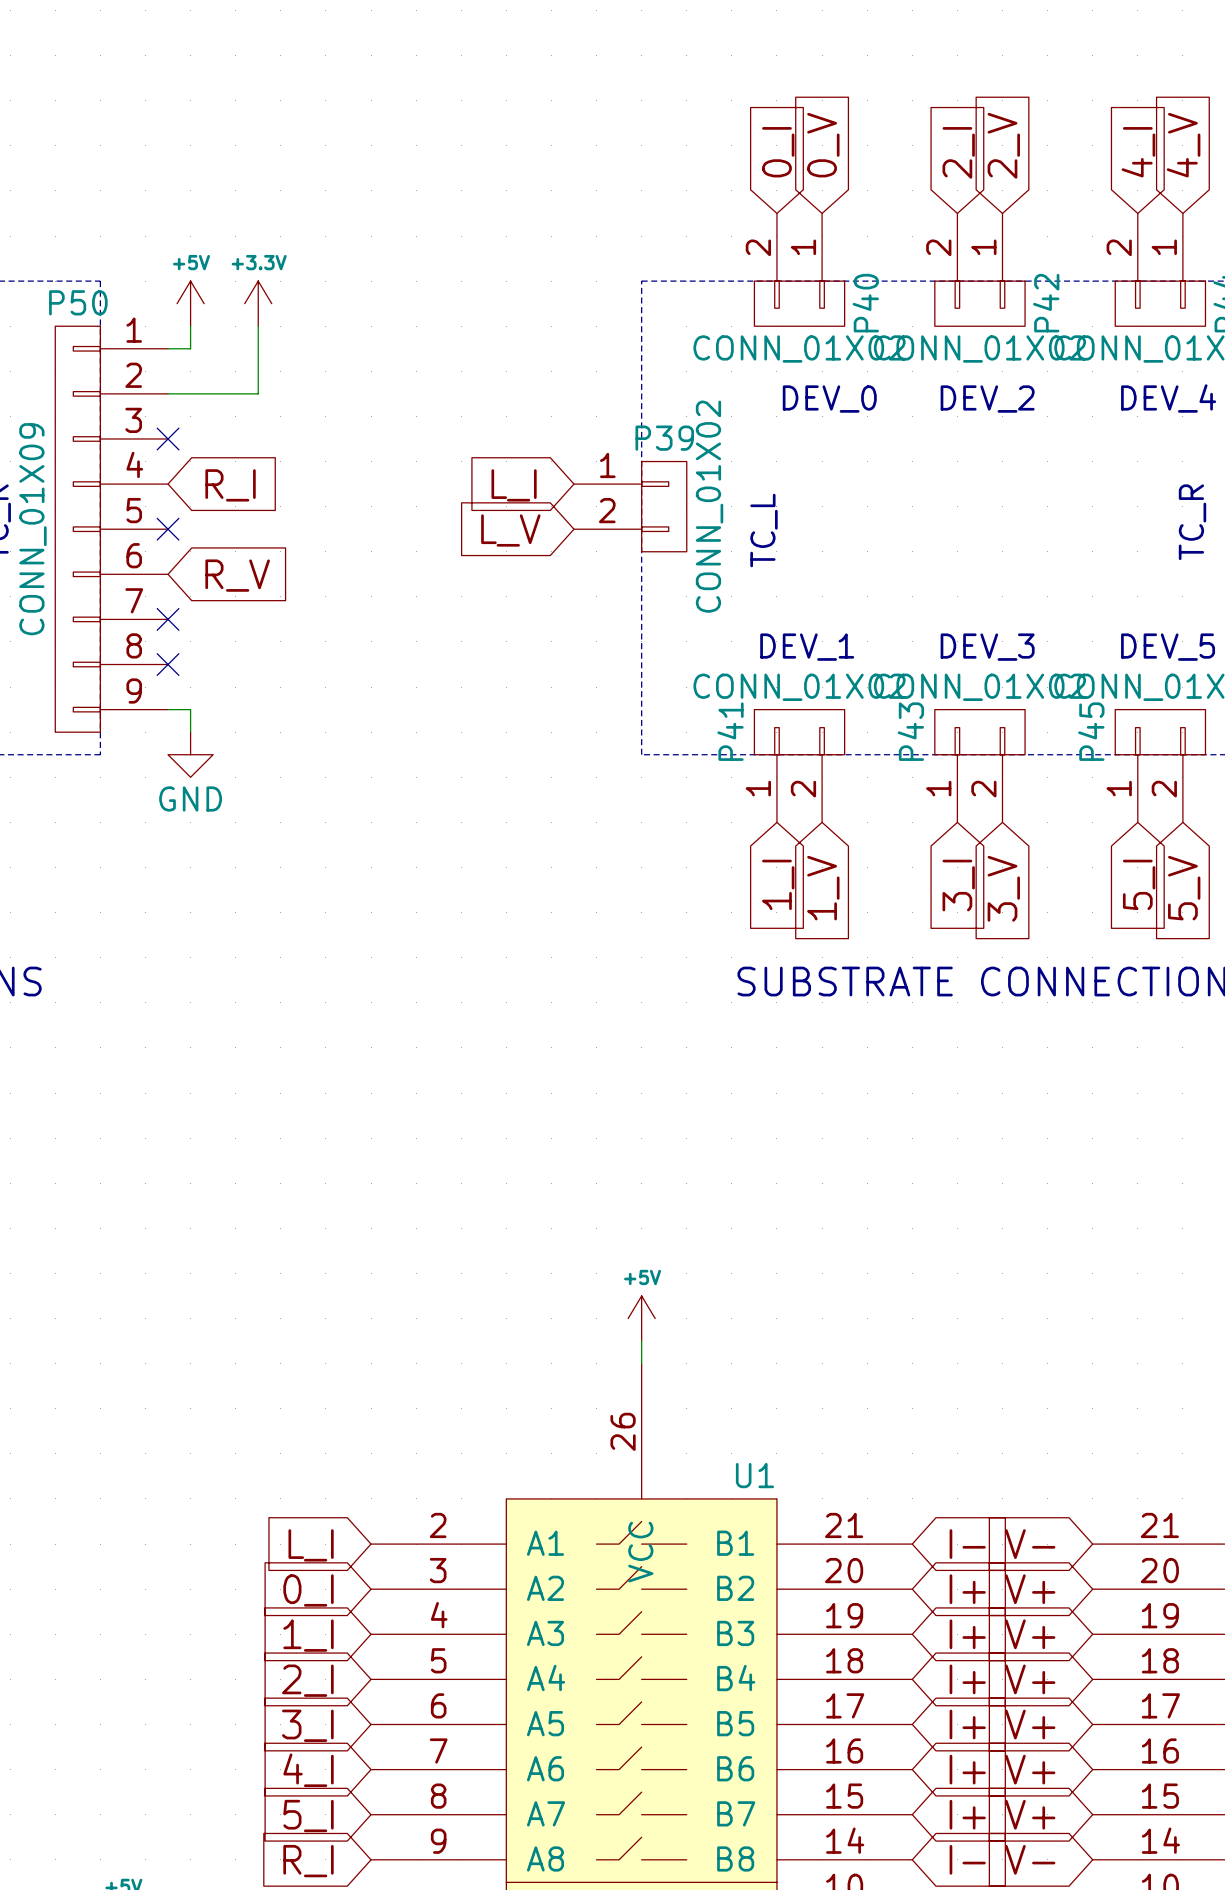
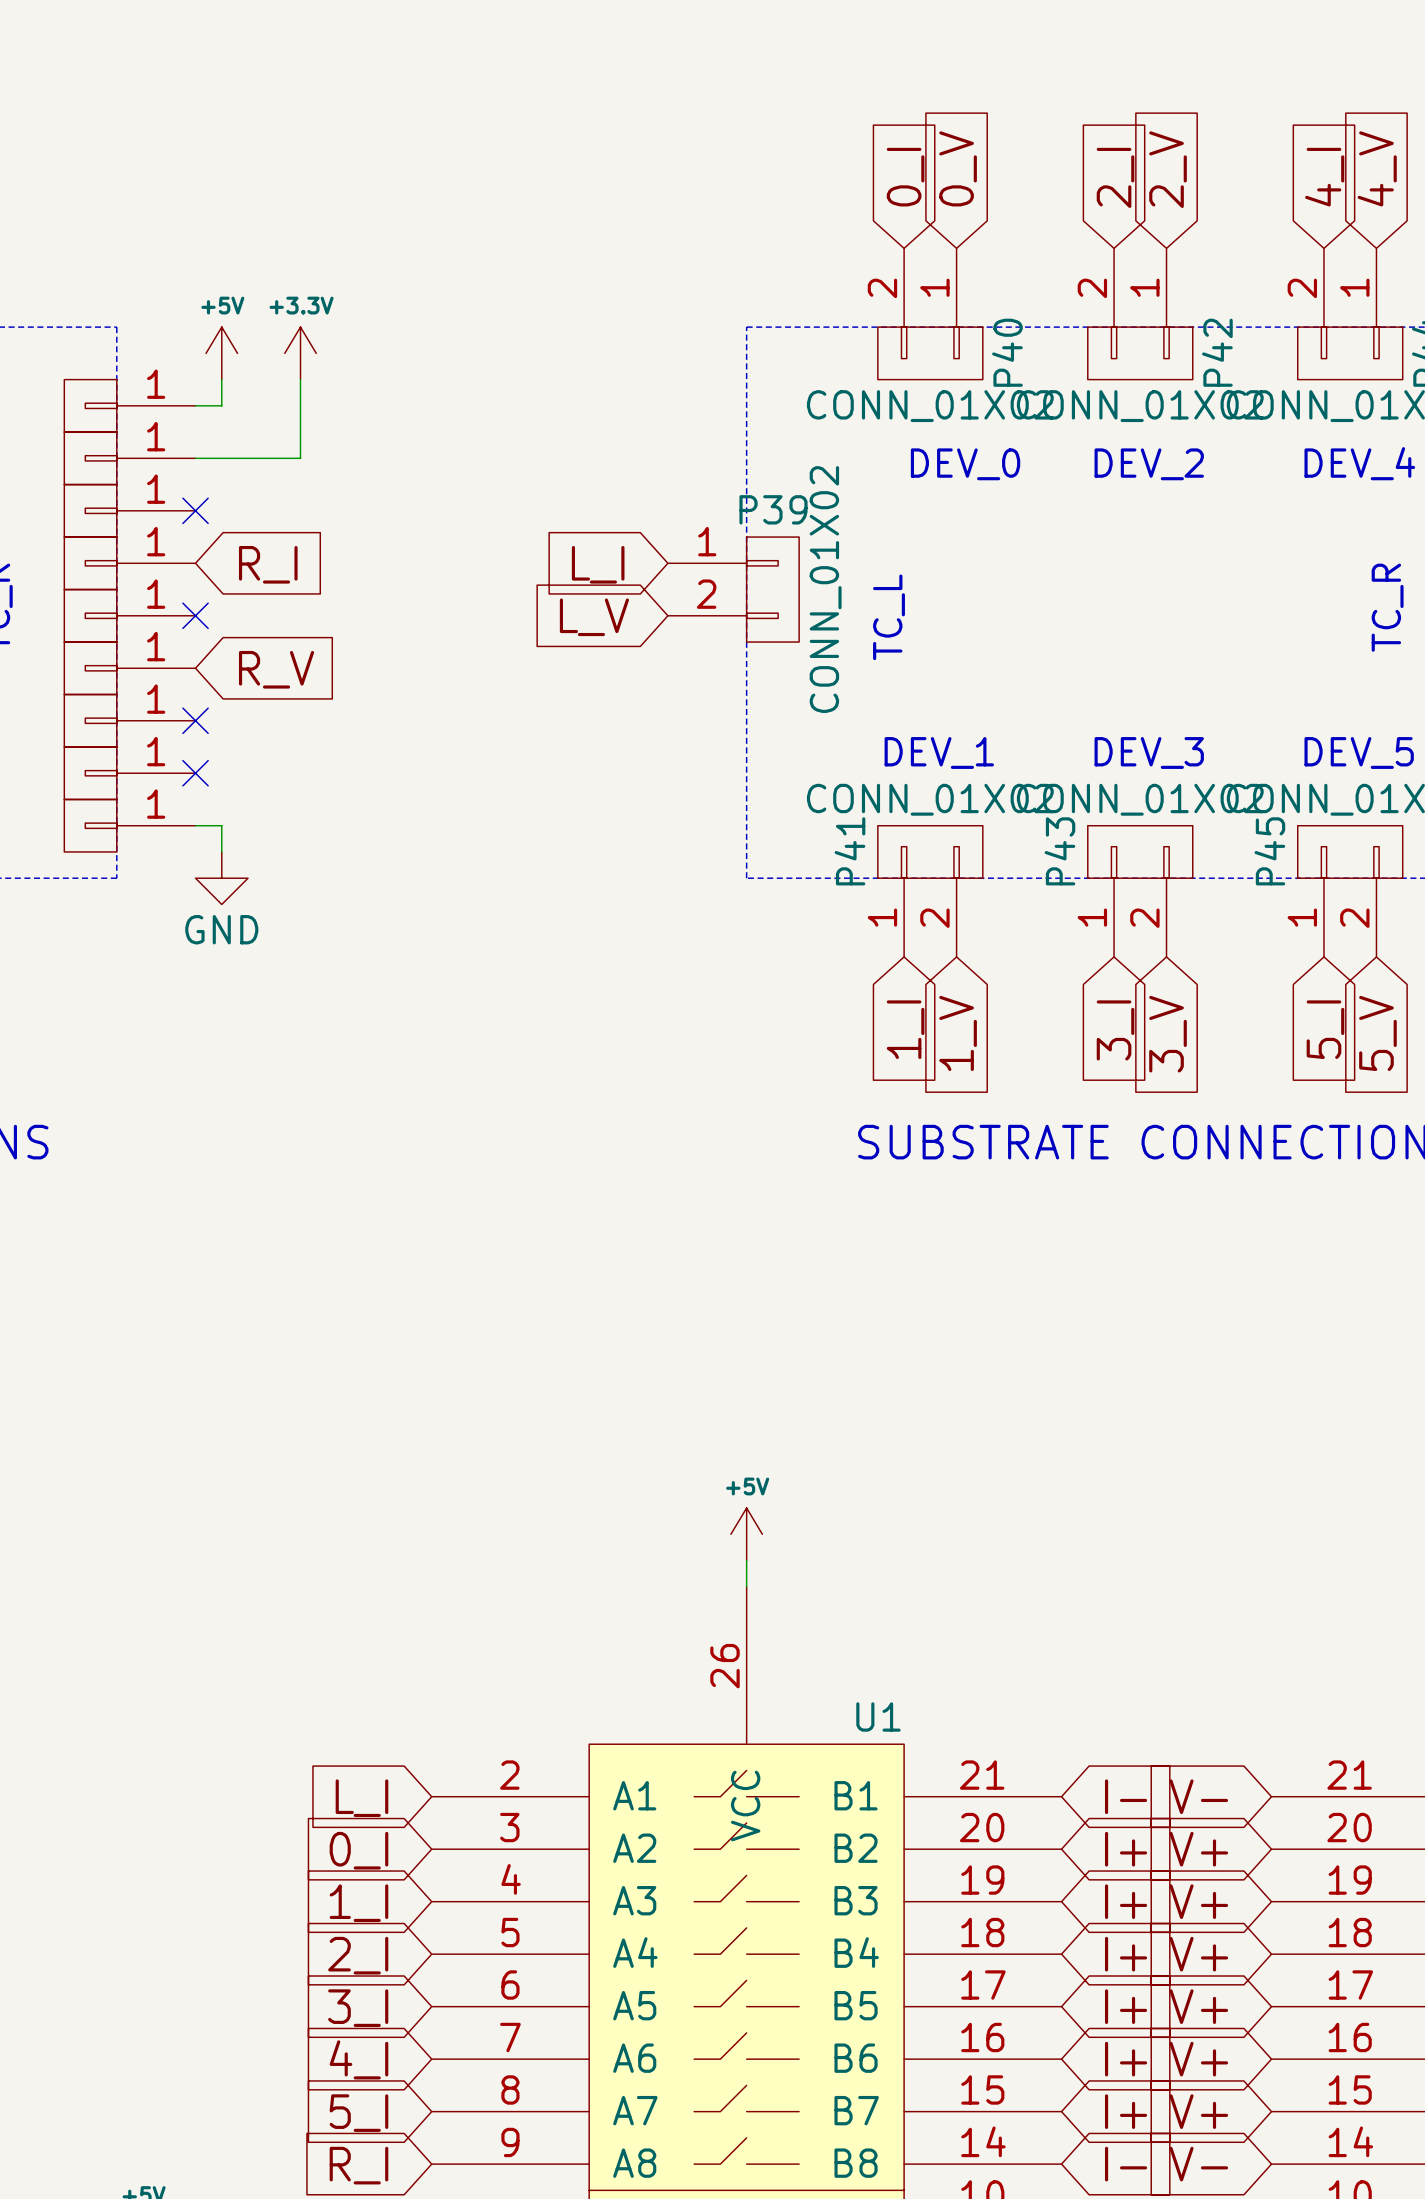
part: none -> (129, 405)
part: none -> (129, 458)
part: none -> (129, 510)
part: none -> (129, 563)
P50: CONN_01X09 (111, 529) -> none
part: none -> (129, 615)
part: none -> (129, 668)
part: none -> (129, 720)
part: none -> (129, 773)
part: none -> (129, 825)

